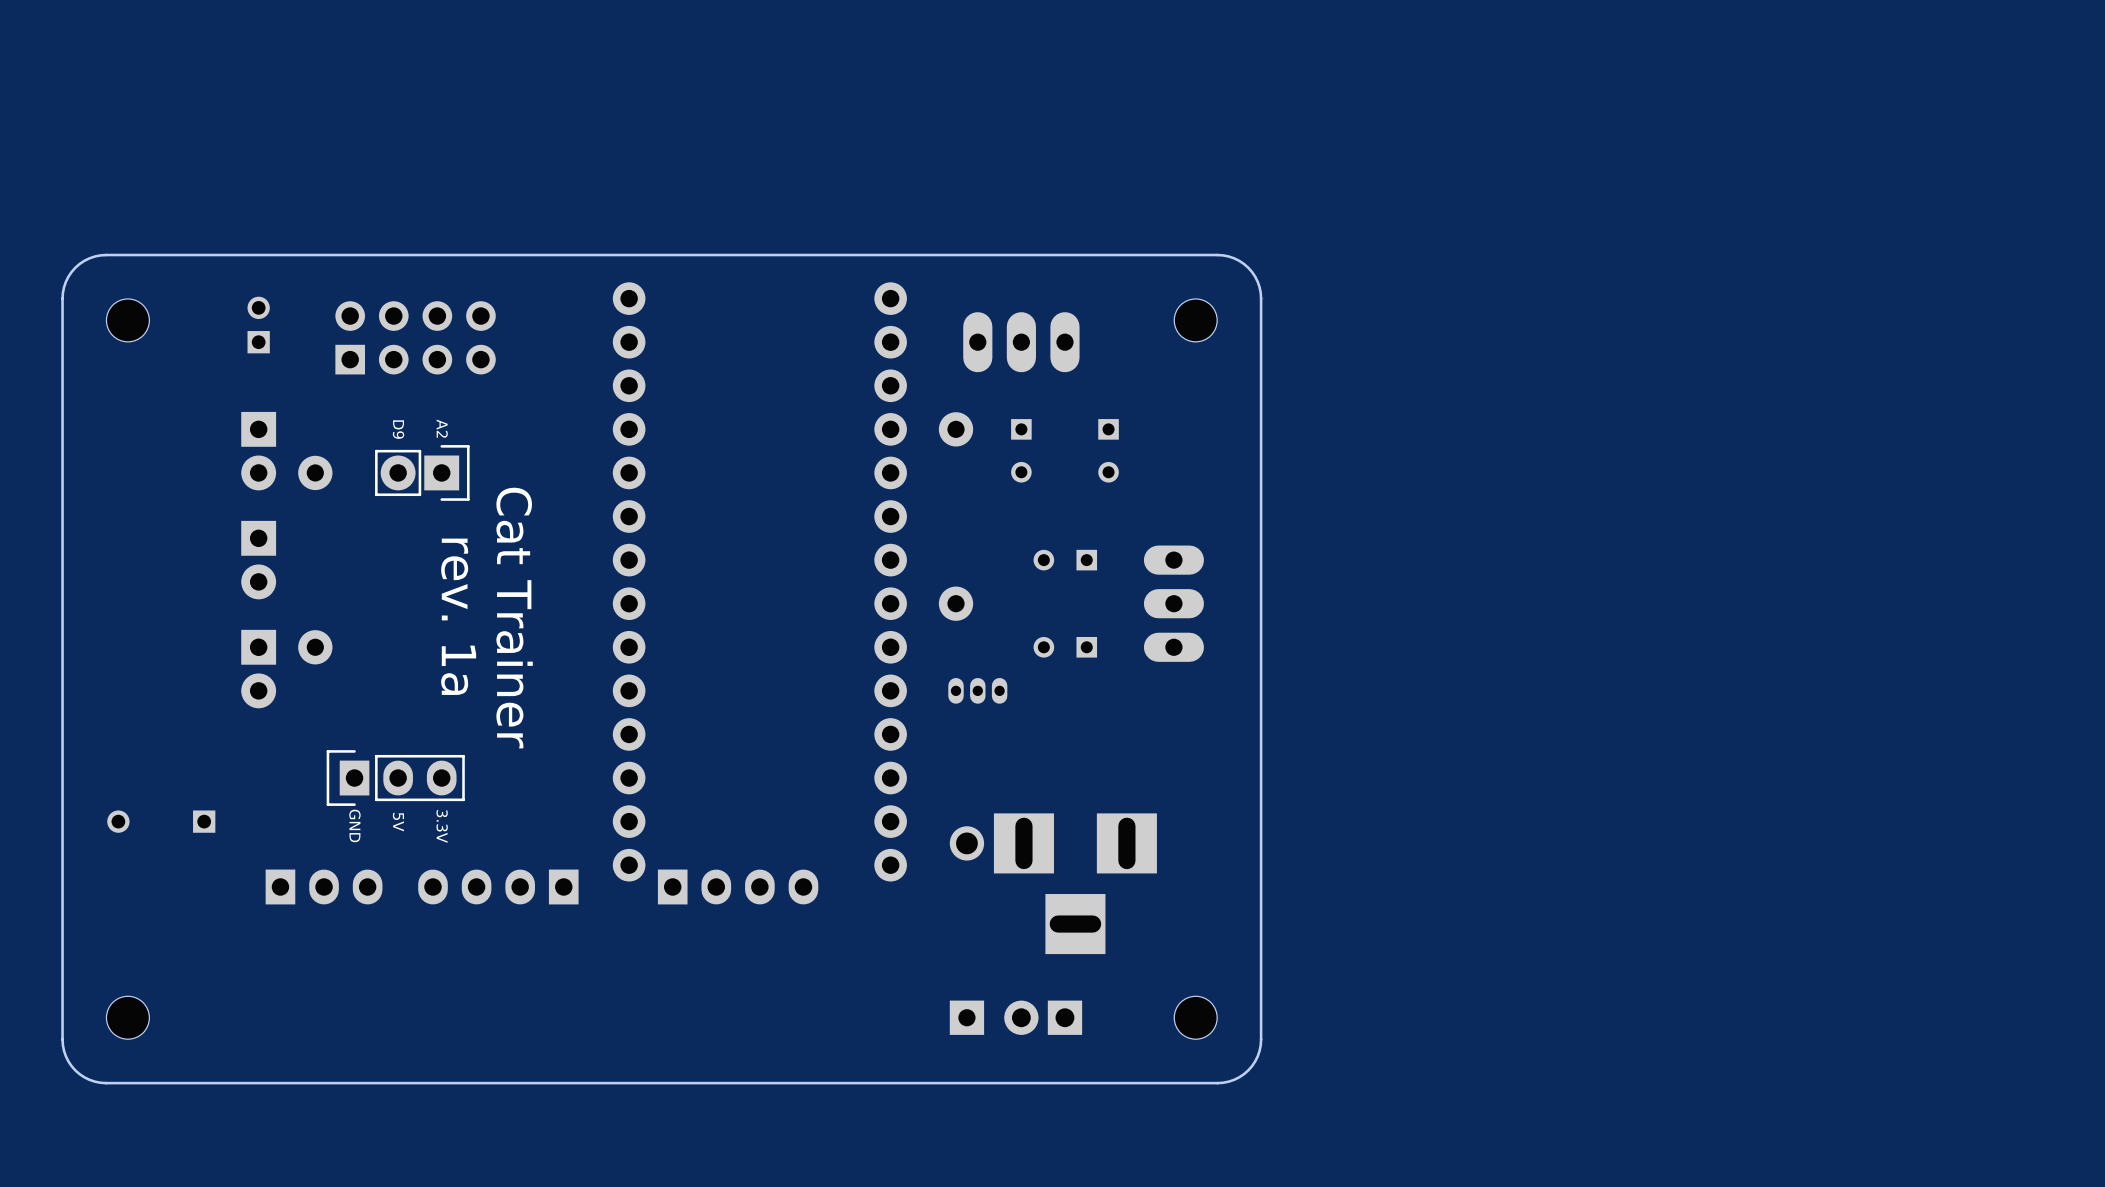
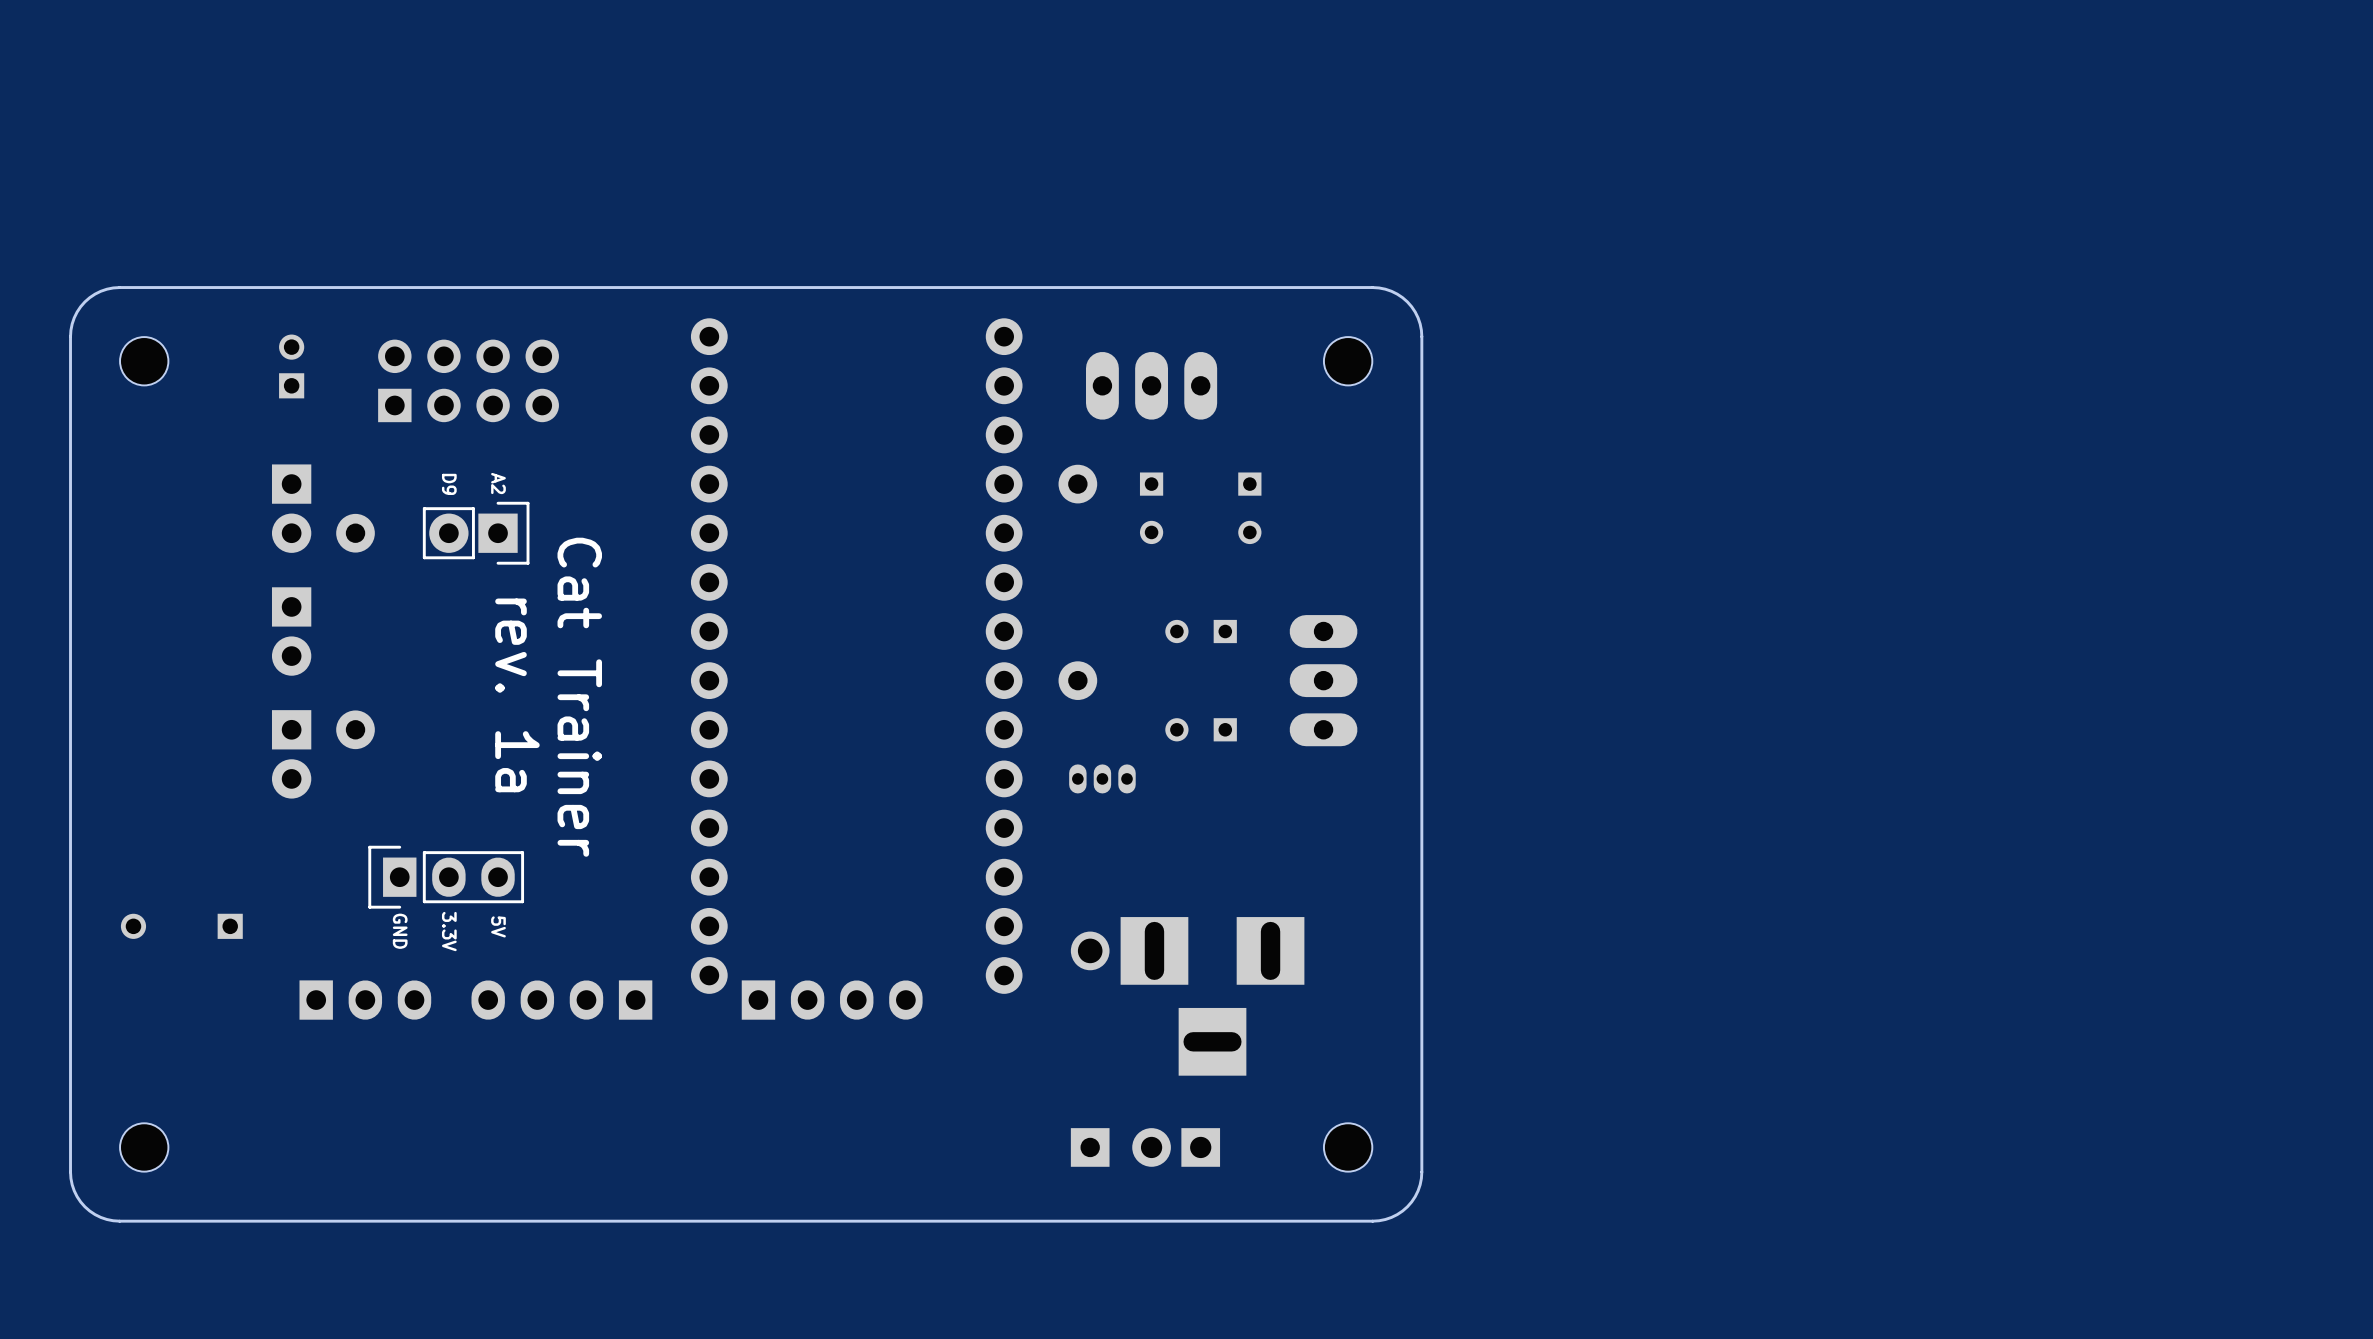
text: 5V (398, 822) -> 3.3V (449, 931)
text: 3.3V (442, 826) -> 5V (498, 926)

